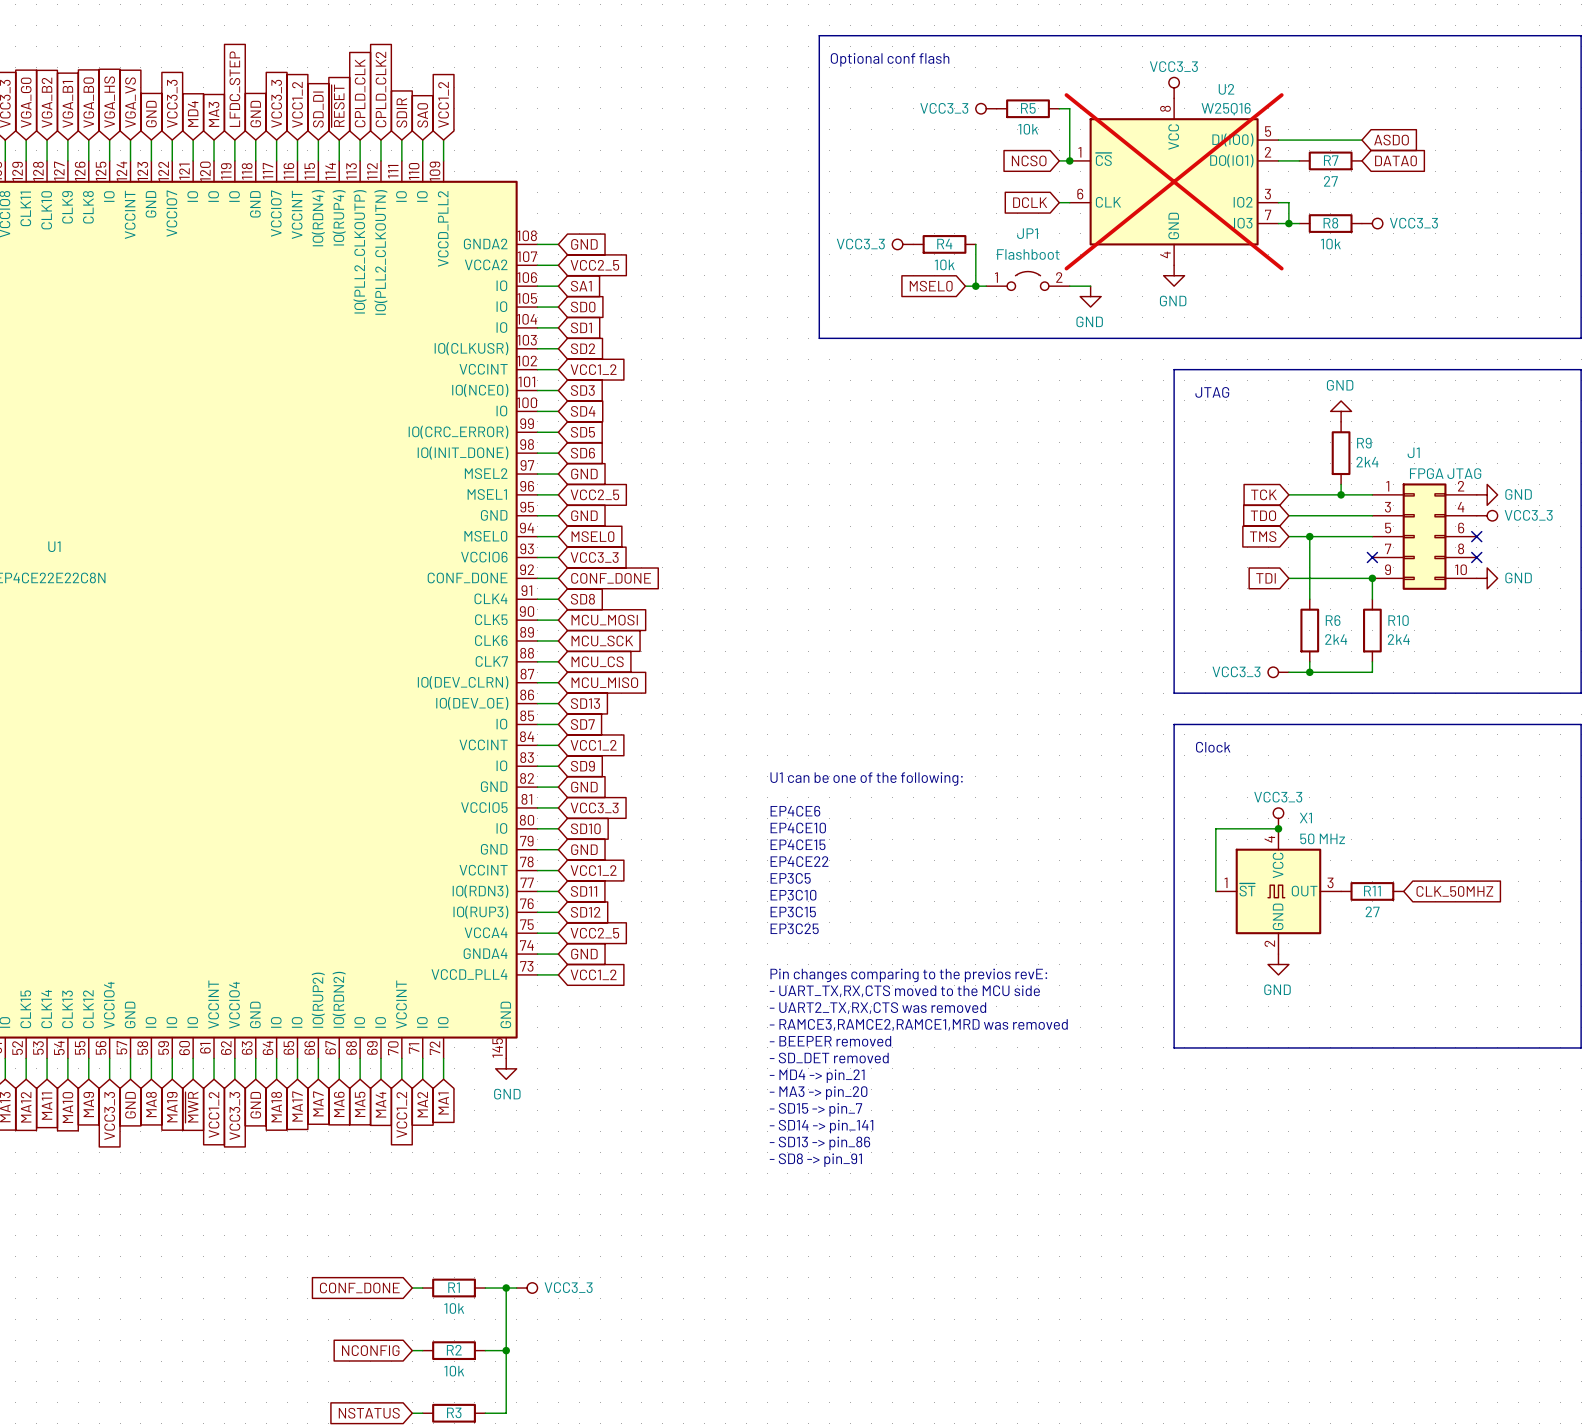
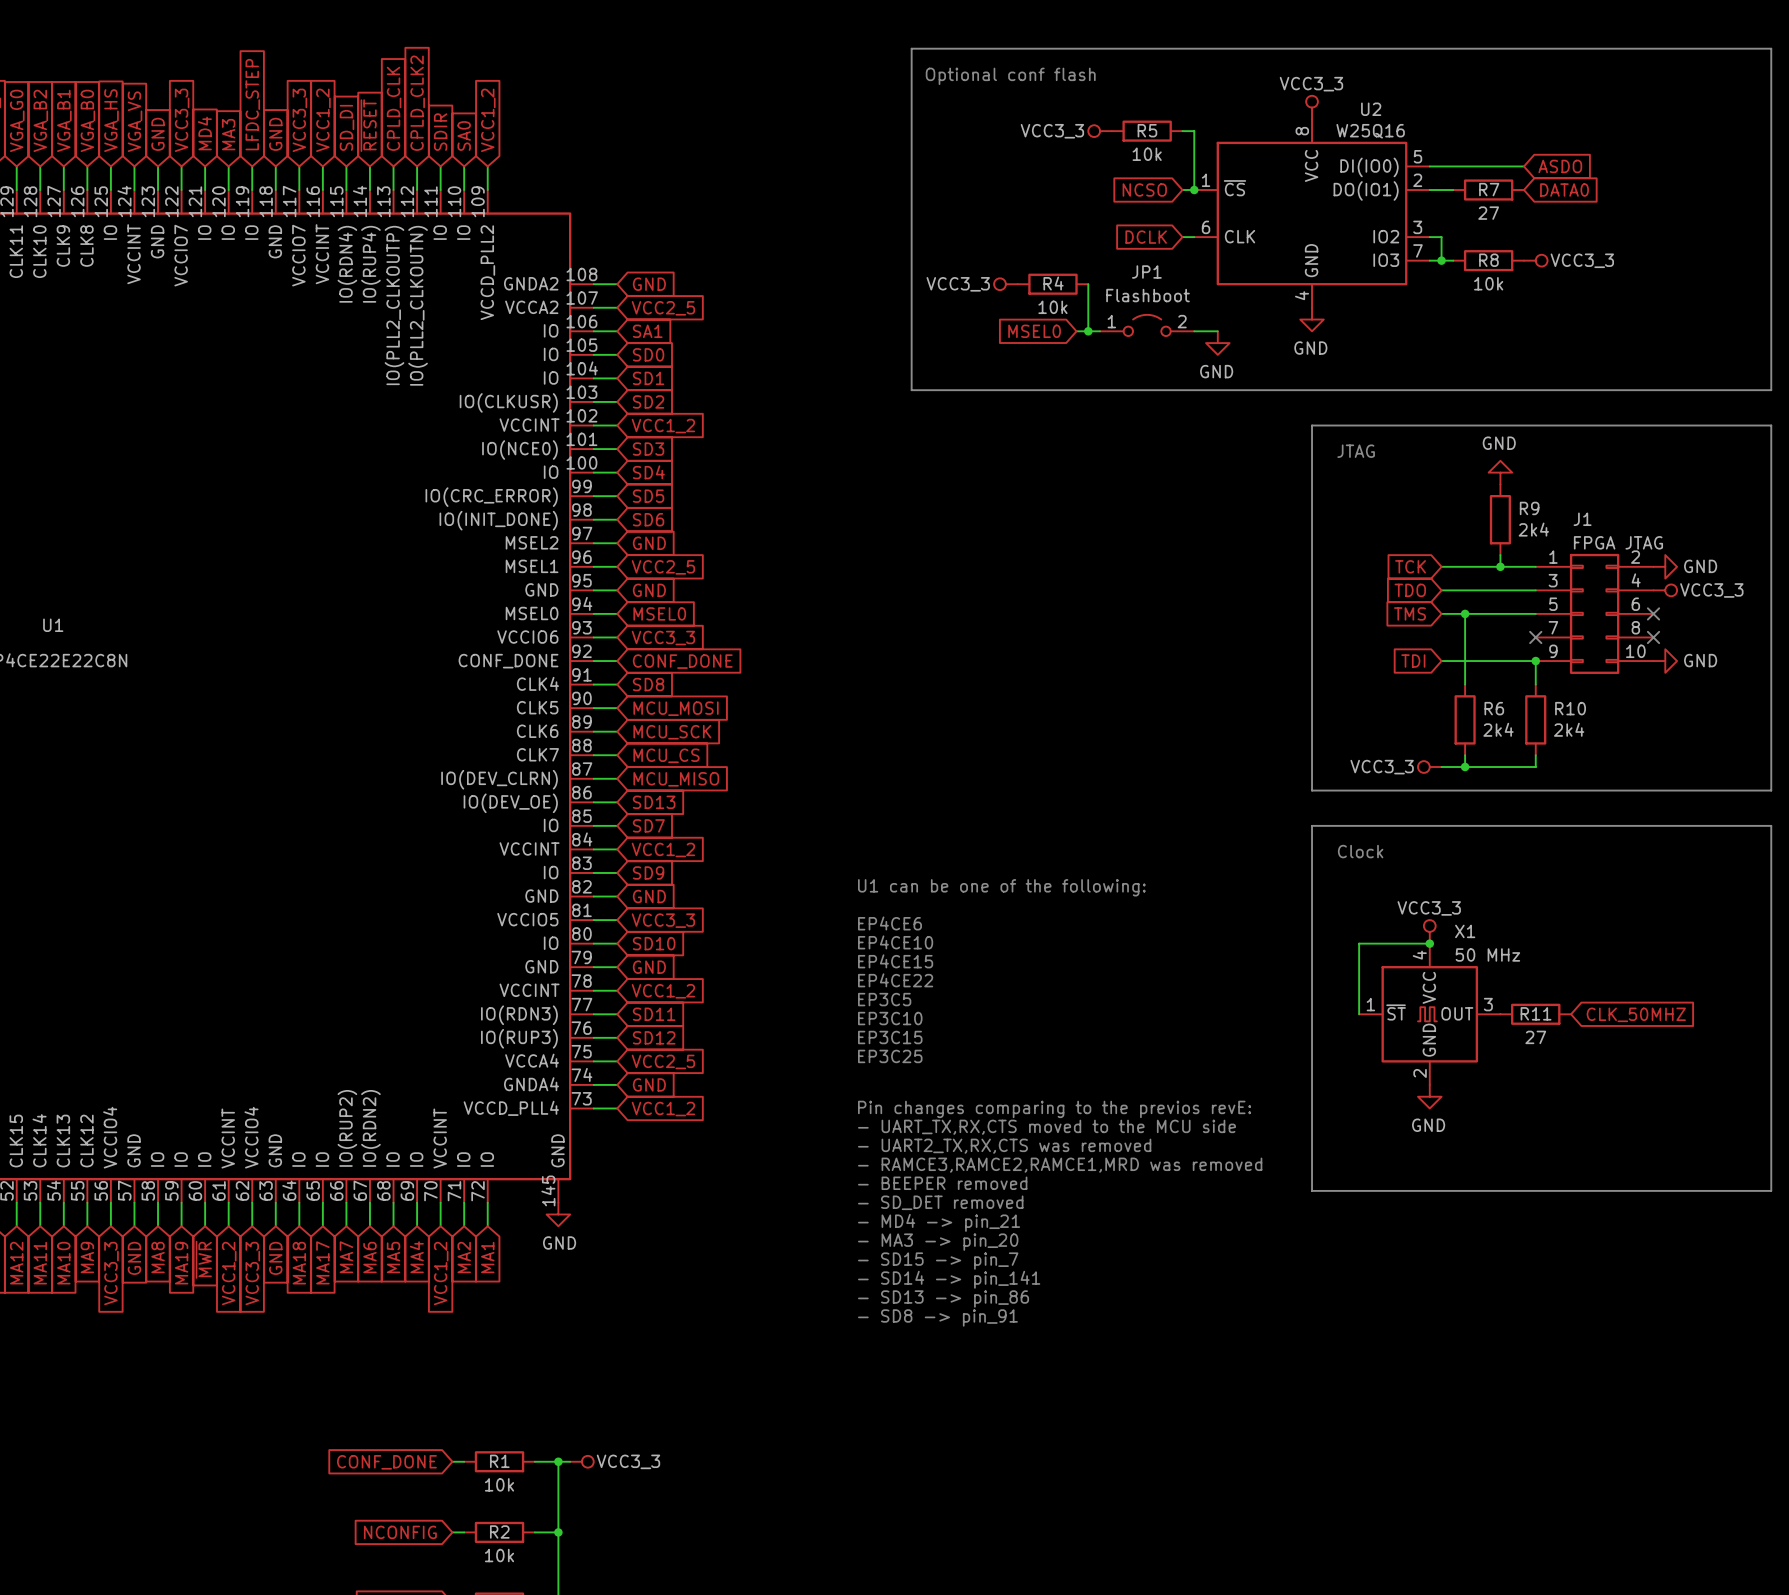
U2 do-not-place cross: (1174, 181) -> none

